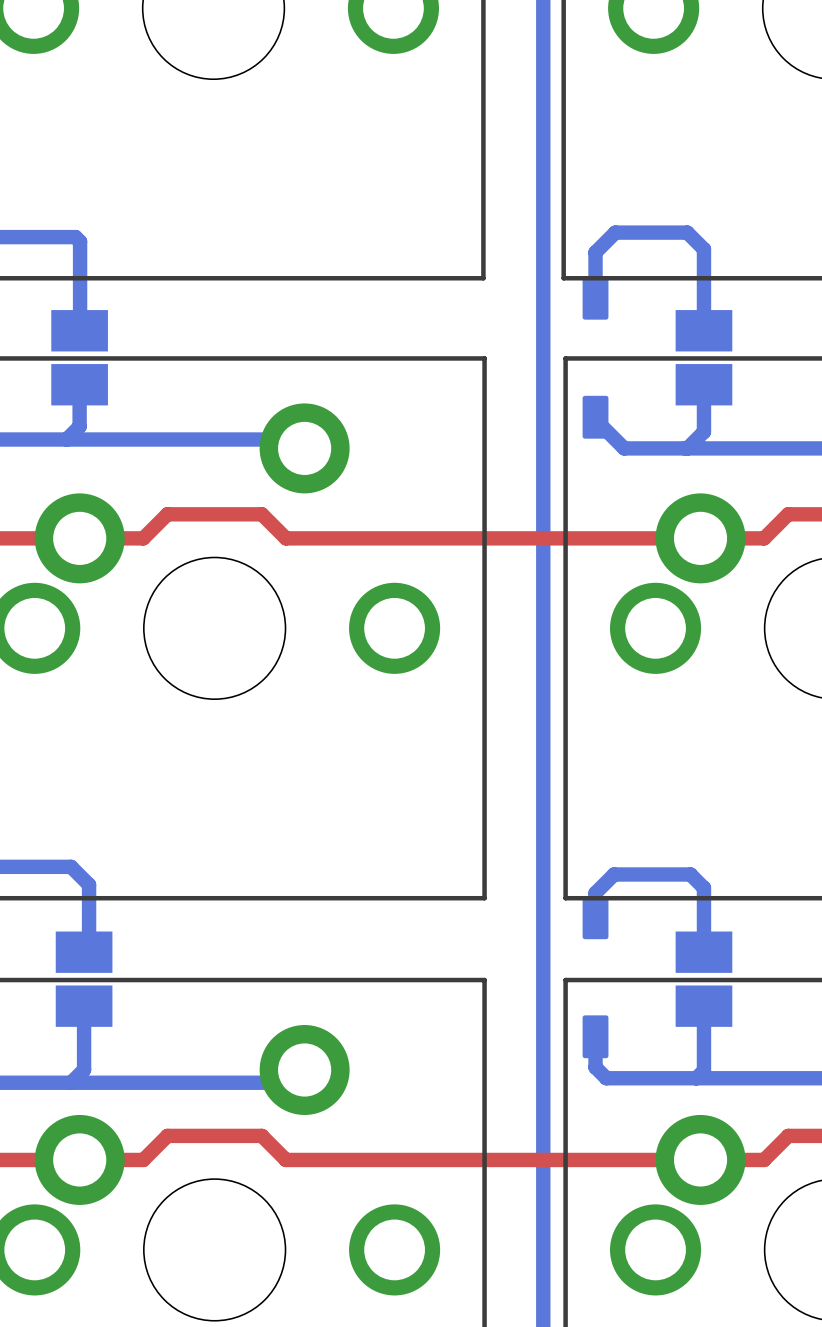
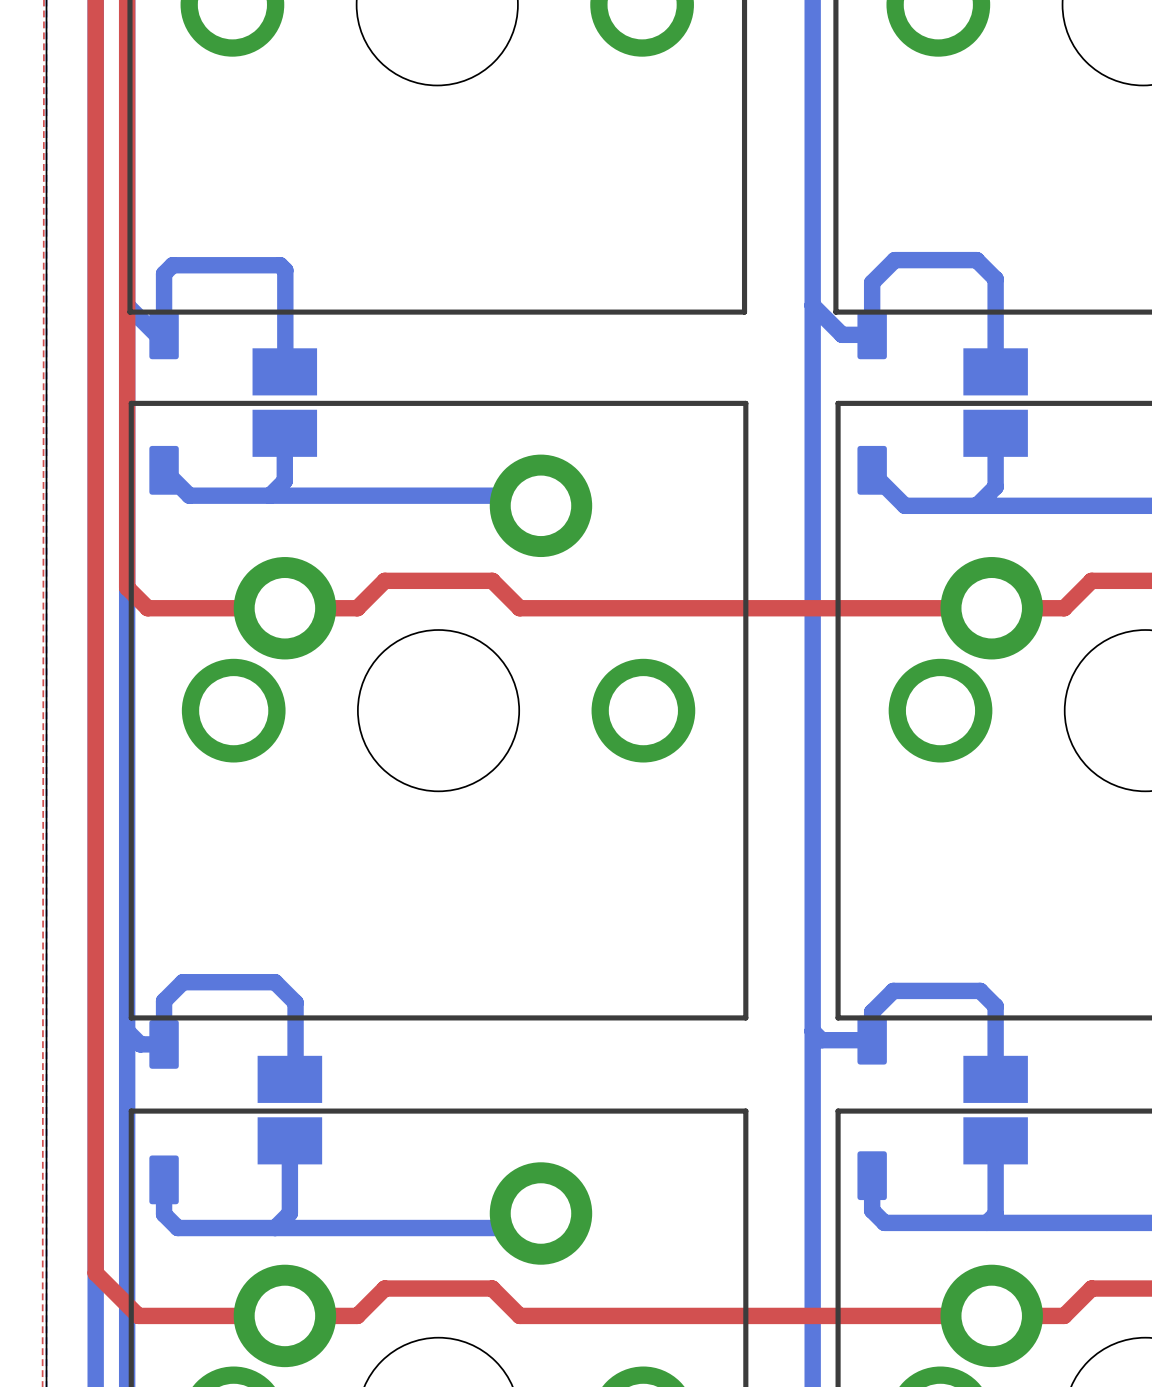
bottom track: none -> (812, 305) (842, 334) (872, 334)
bottom track: none -> (812, 1031) (821, 1040) (872, 1040)

